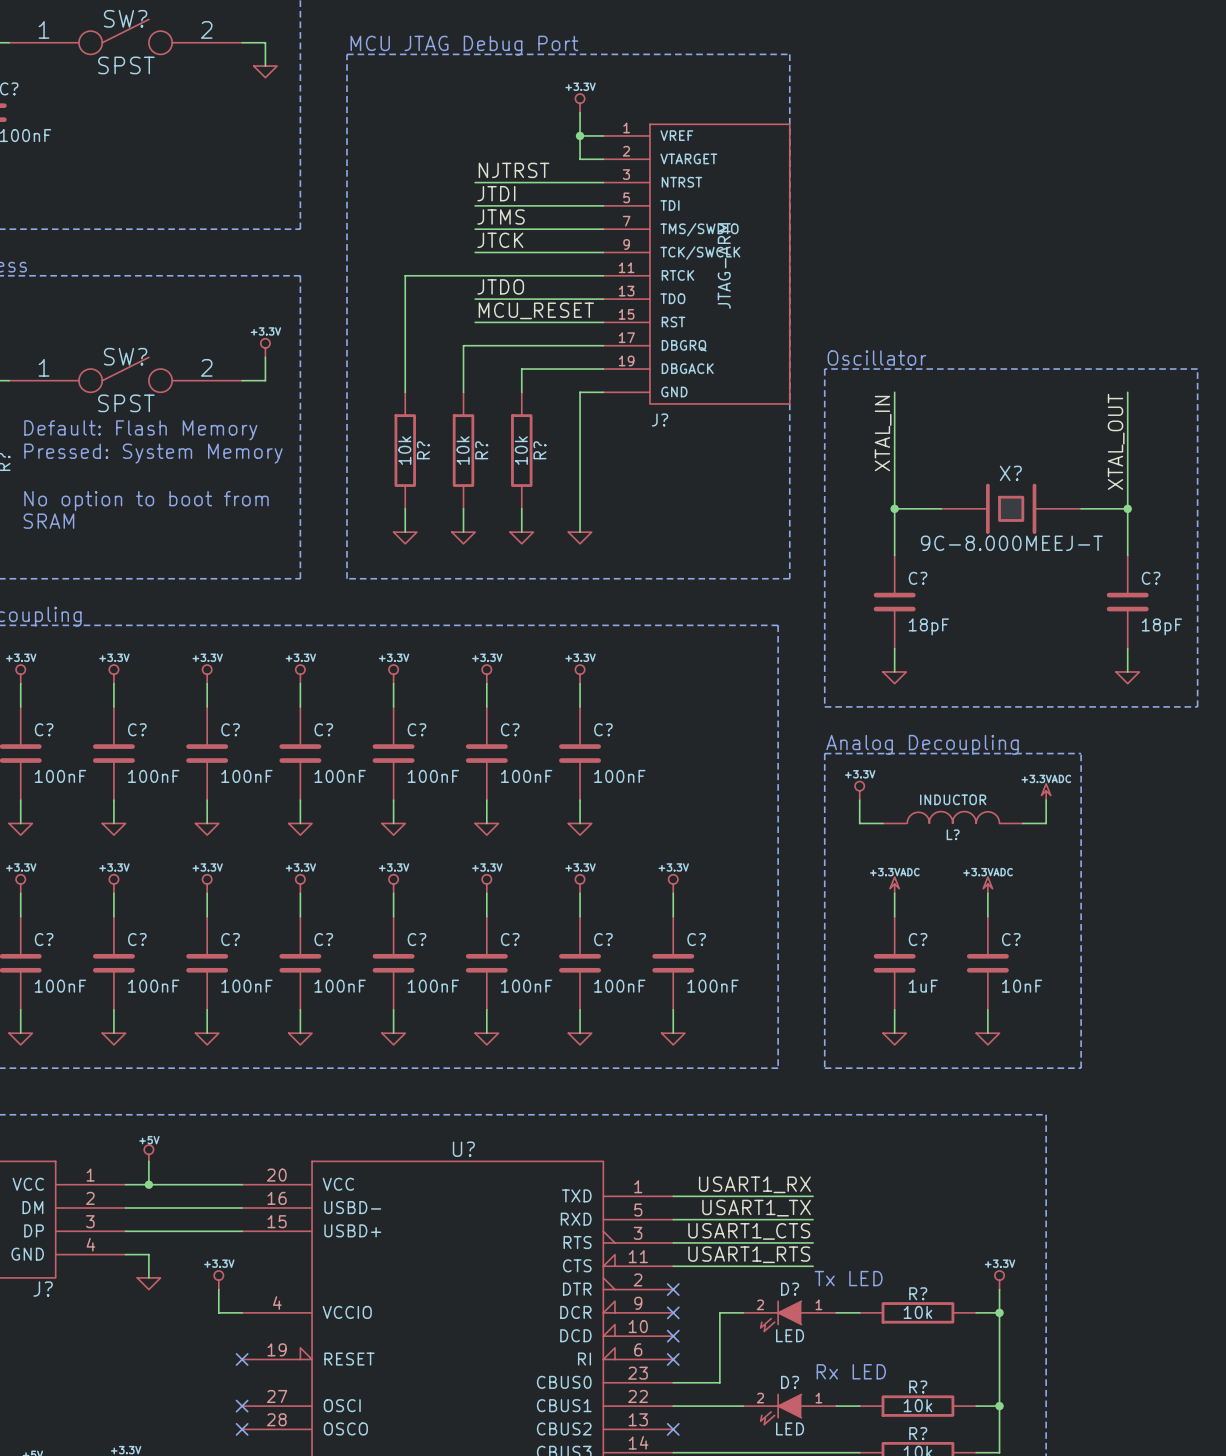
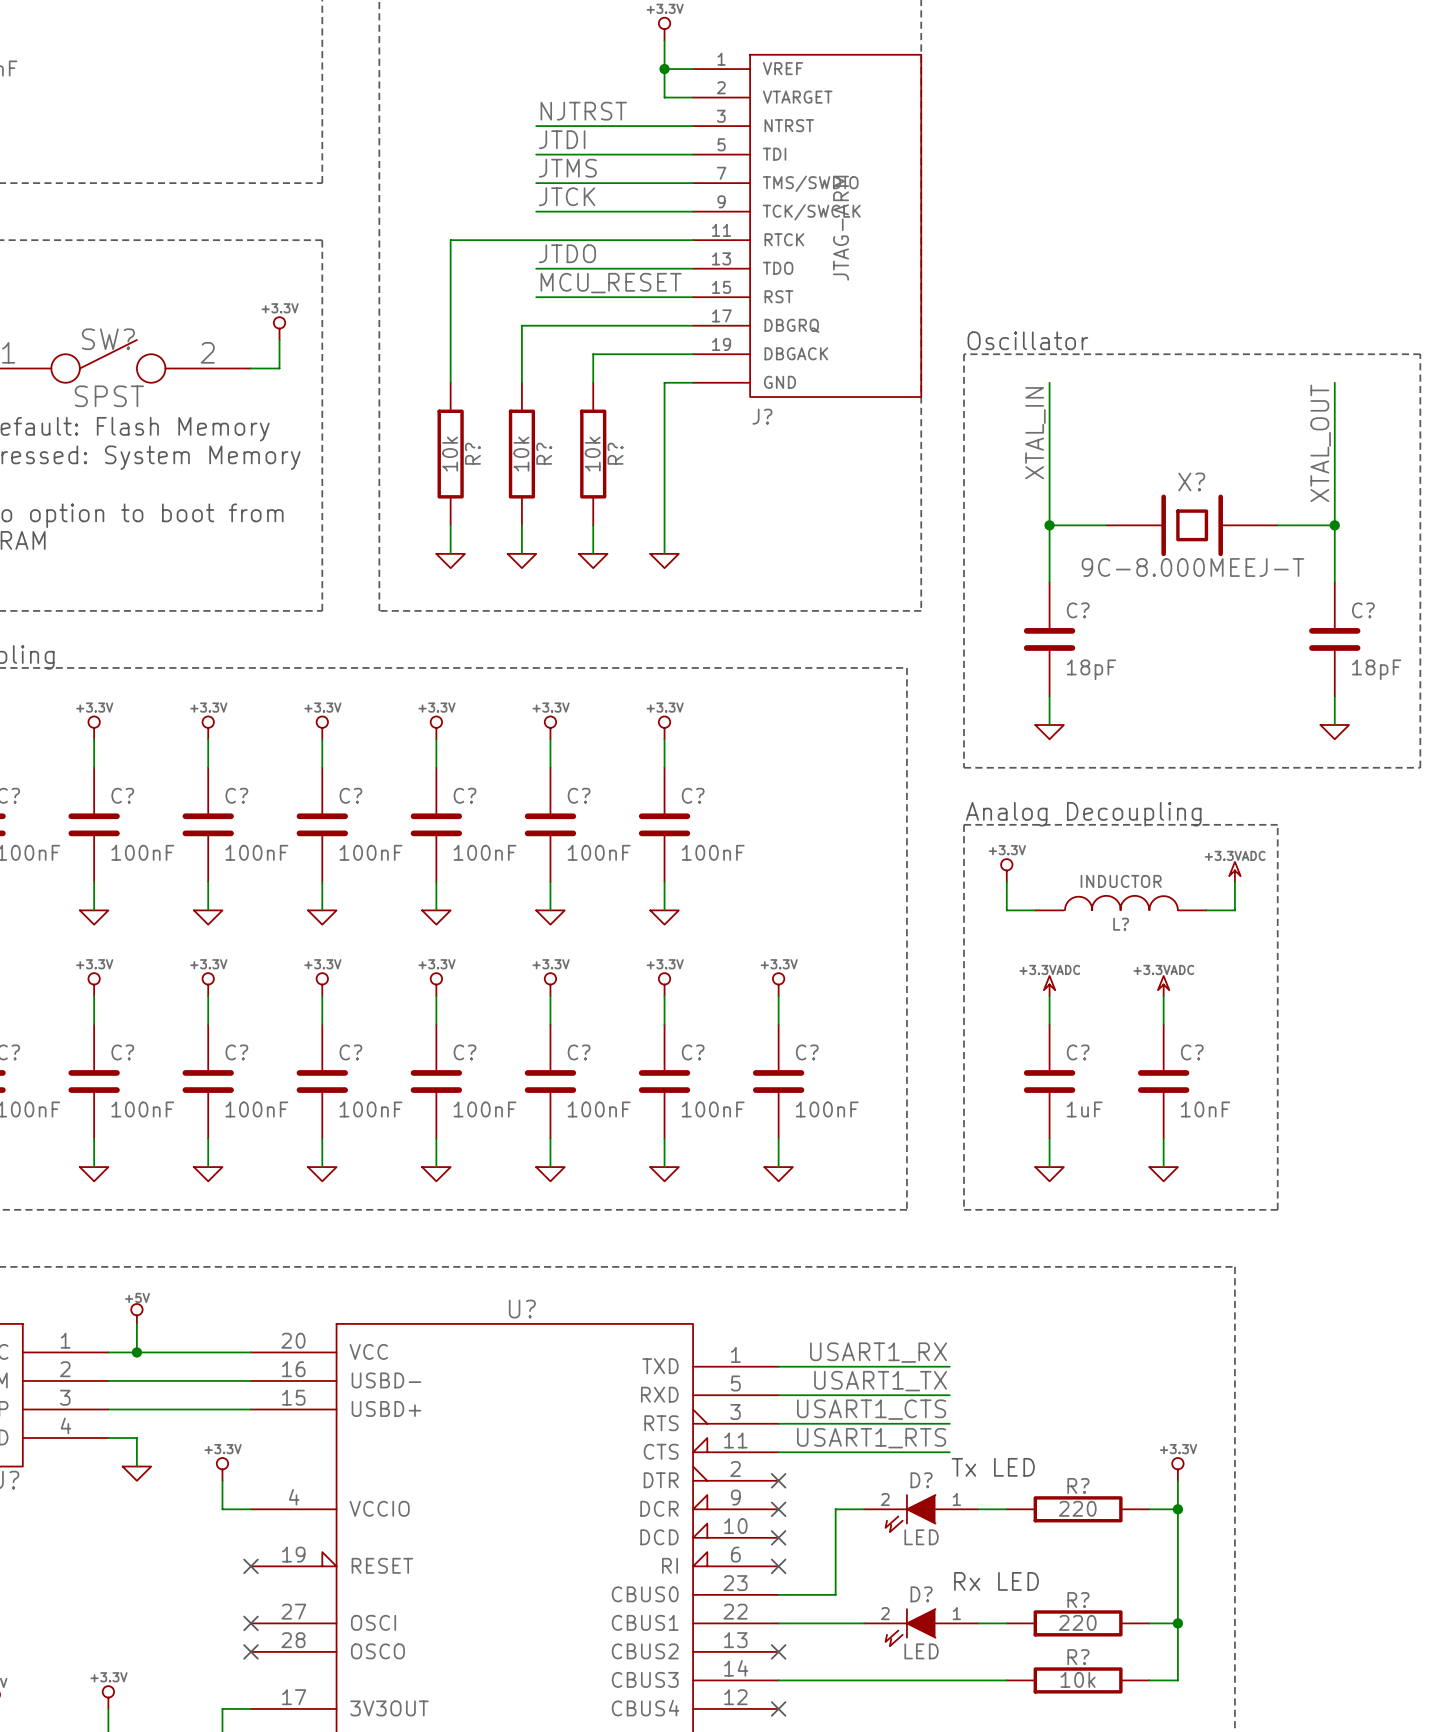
R? value: 10k (917, 1312) -> 220 (1077, 1508)
R? value: 10k (917, 1405) -> 220 (1077, 1622)

